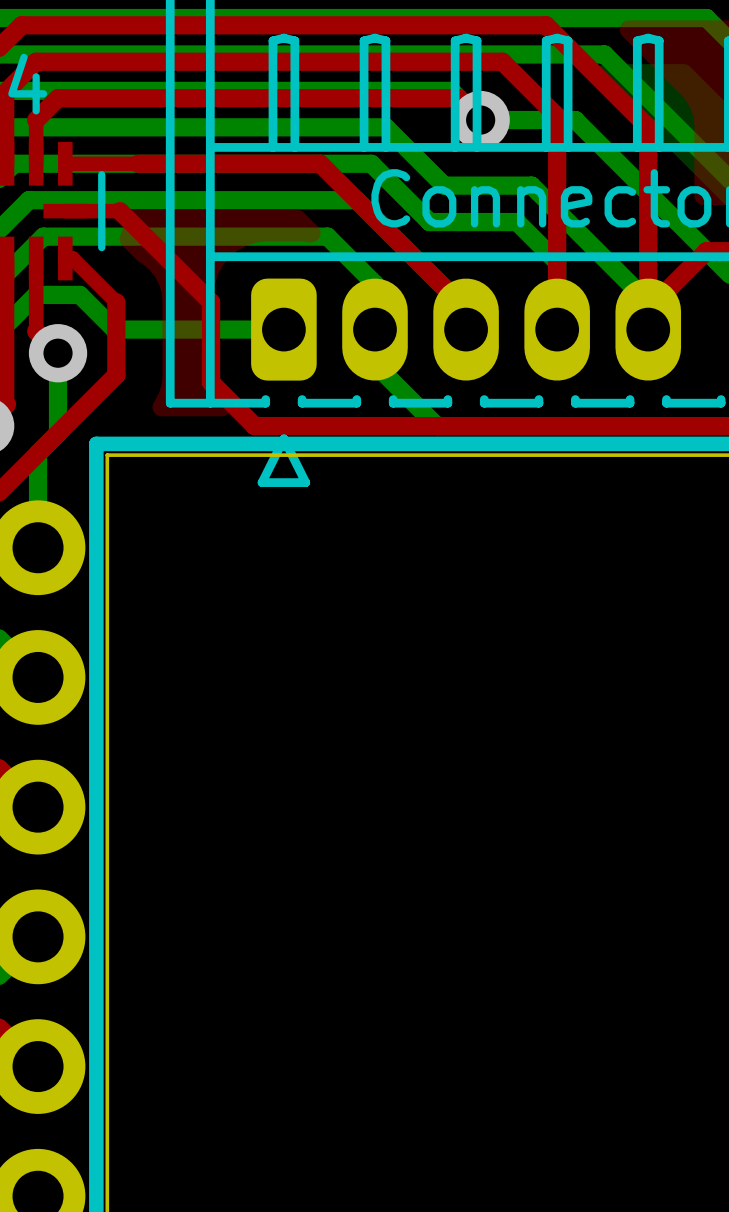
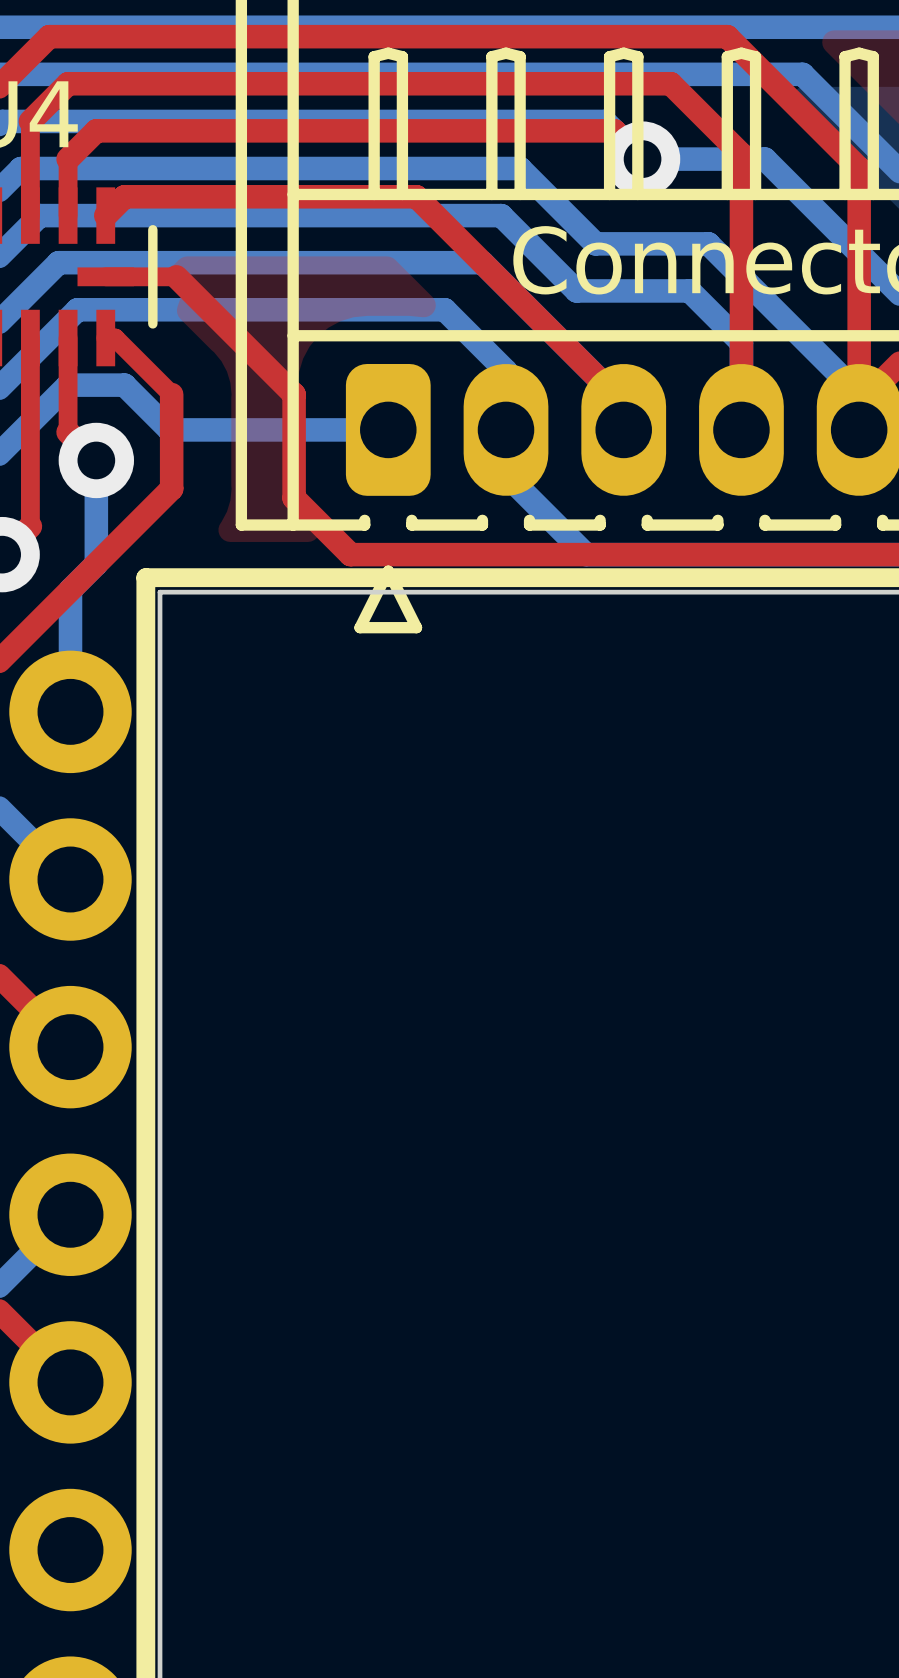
top track: (65, 163) (320, 163) -> (105, 215) (124, 196) (416, 196) (435, 215)

